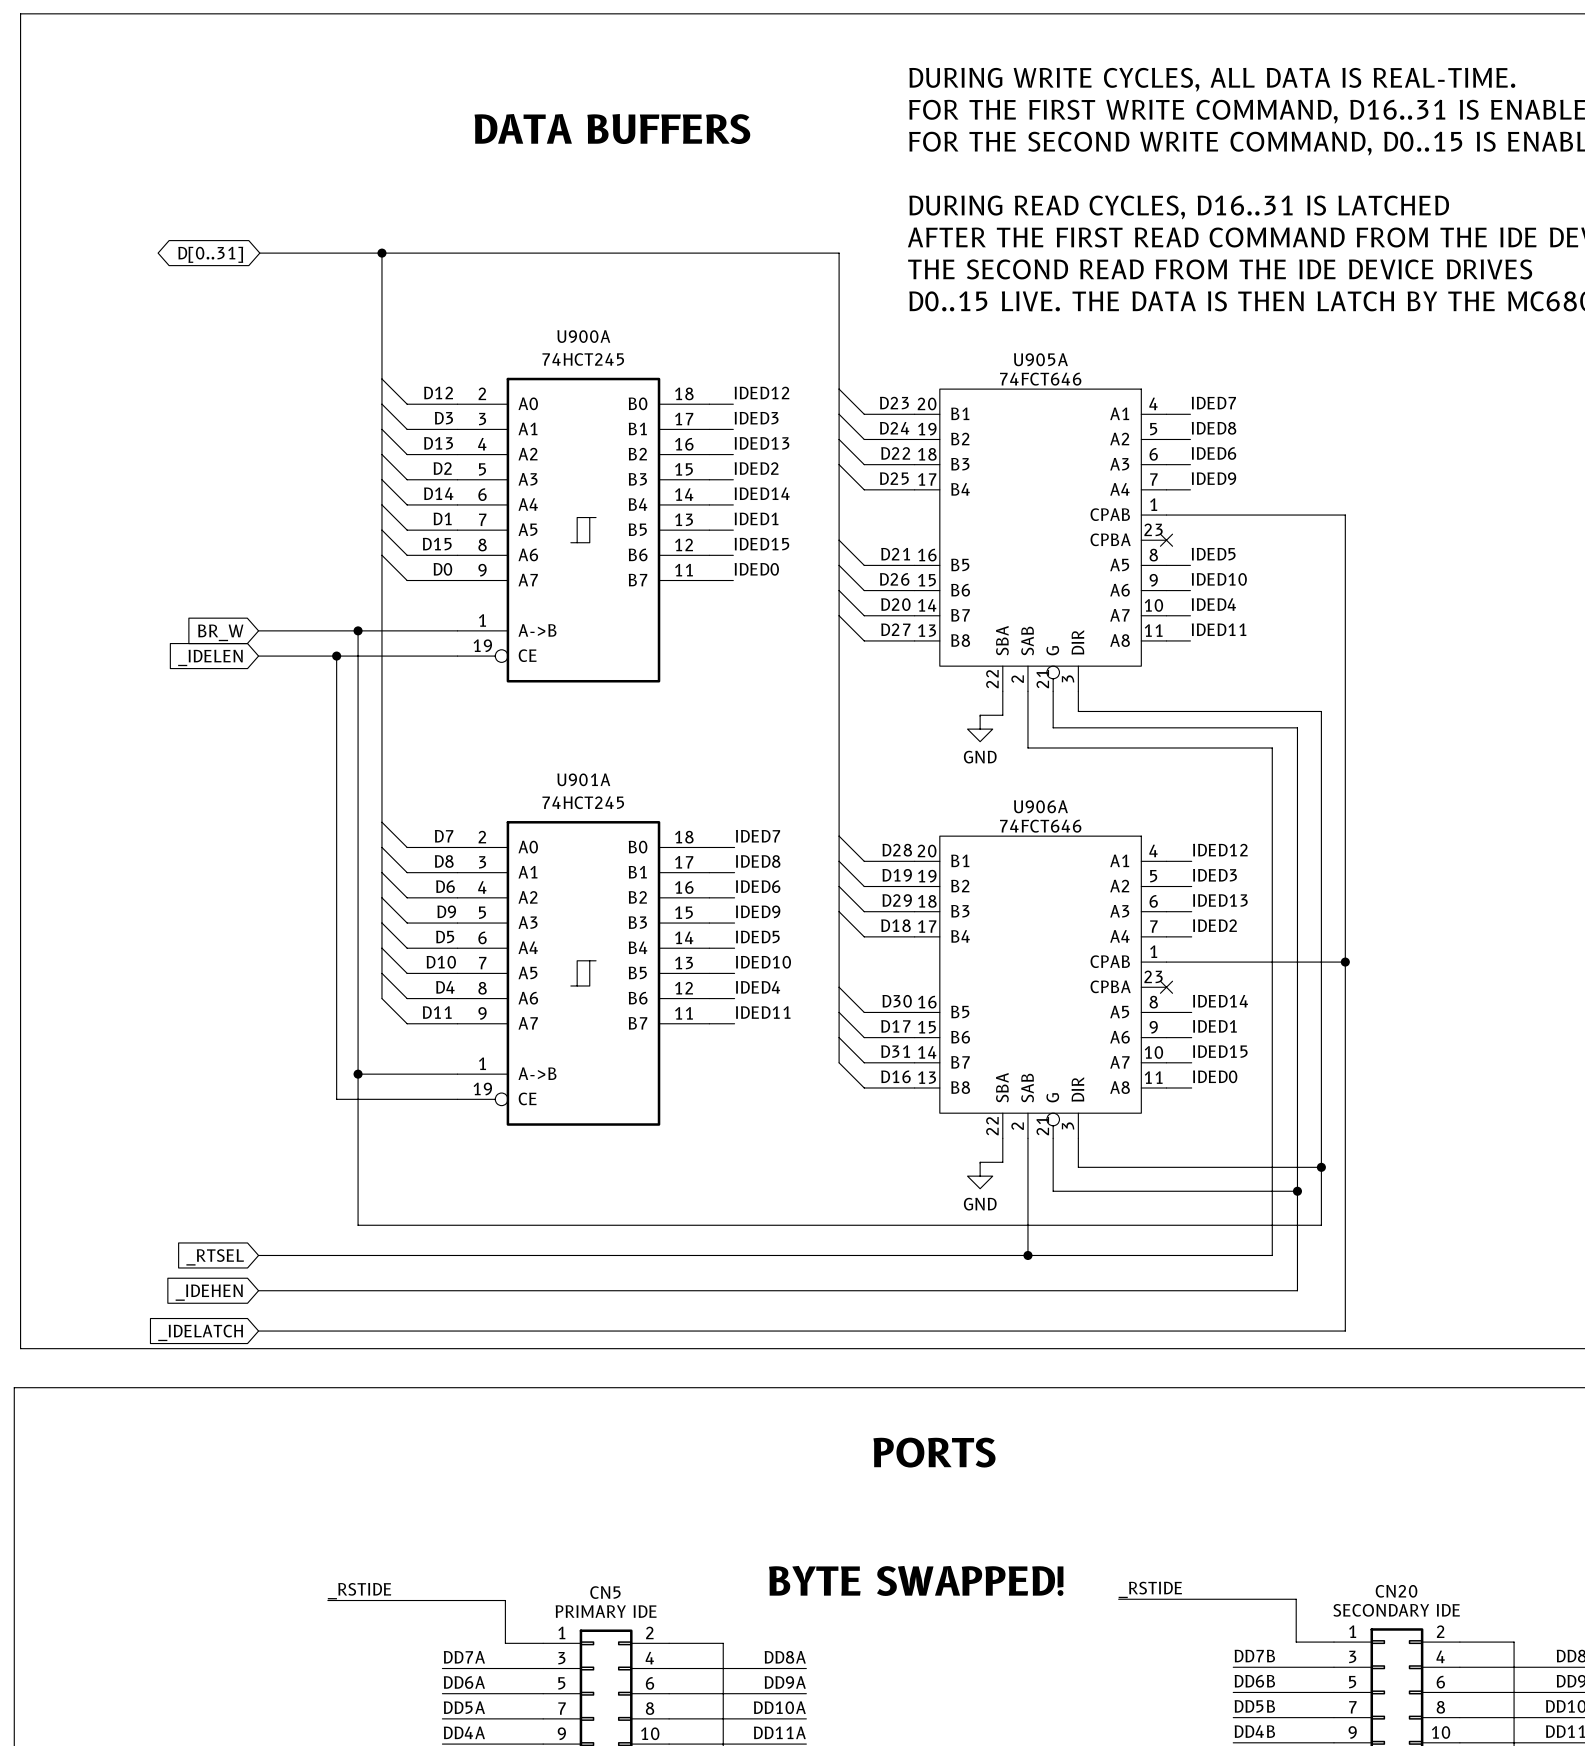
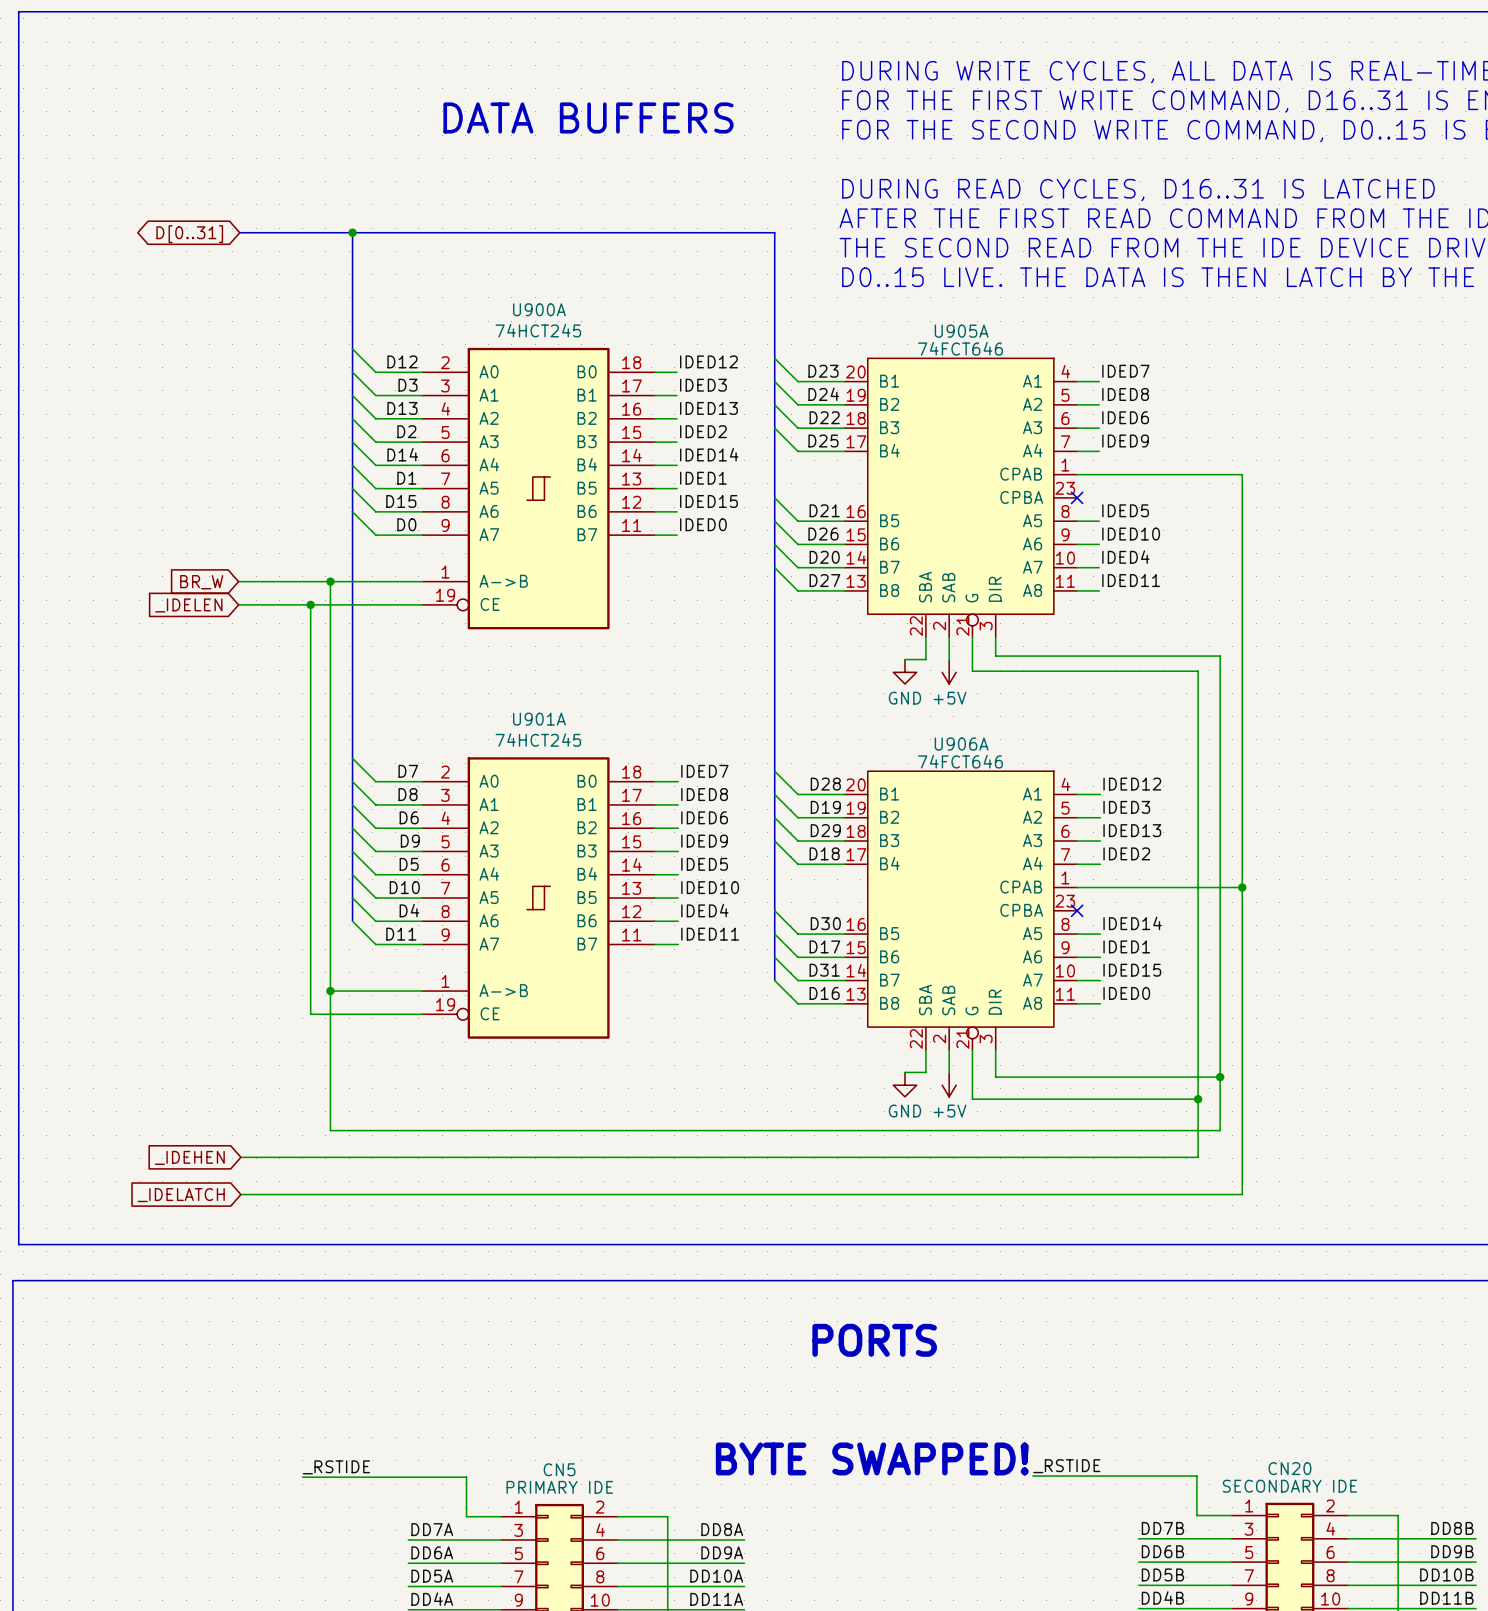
wire: (1027, 716) (1027, 747) (1272, 747) (1272, 1255) (258, 1255) -> none
power symbol: none -> +5V (949, 672)
wire: (1027, 1163) (1027, 1255) -> none
power symbol: none -> +5V (949, 1085)
wire: (1297, 1254) (1297, 1290) (258, 1290) -> (1198, 1157) (240, 1157)
junction: (1027, 1255) -> none
global label: _RTSEL (215, 1257) -> none
global label position: _IDEHEN (209, 1292) -> _IDEHEN (189, 1157)
wire: (1345, 1294) (1345, 1331) (258, 1331) -> (1242, 1194) (240, 1194)
global label position: _IDELATCH (200, 1332) -> _IDELATCH (181, 1195)

